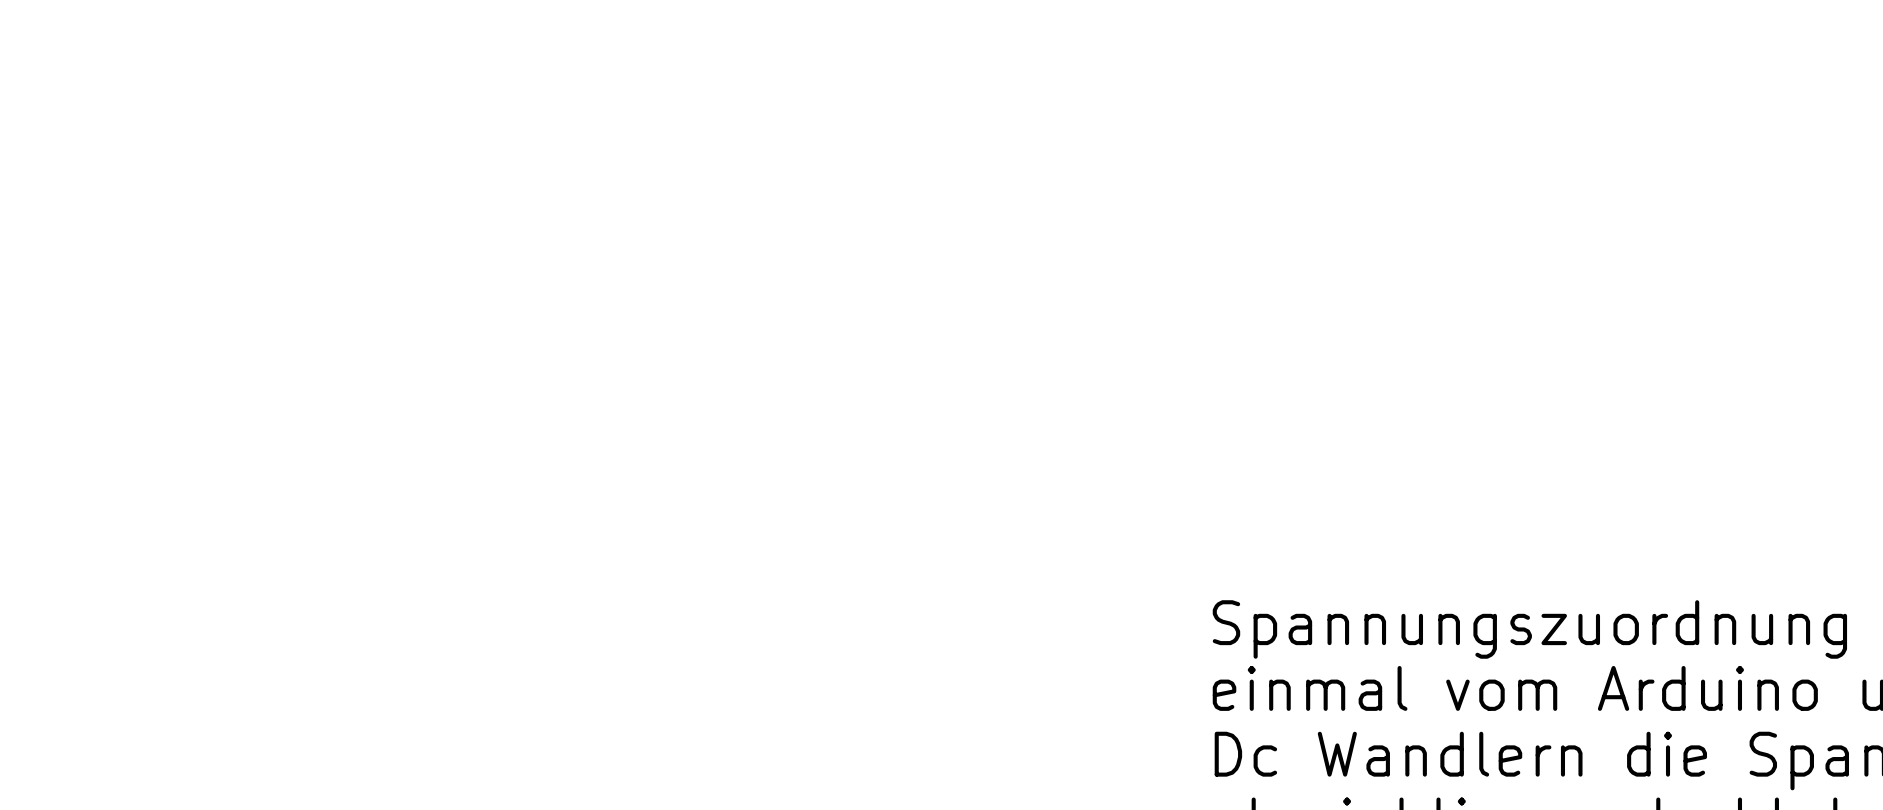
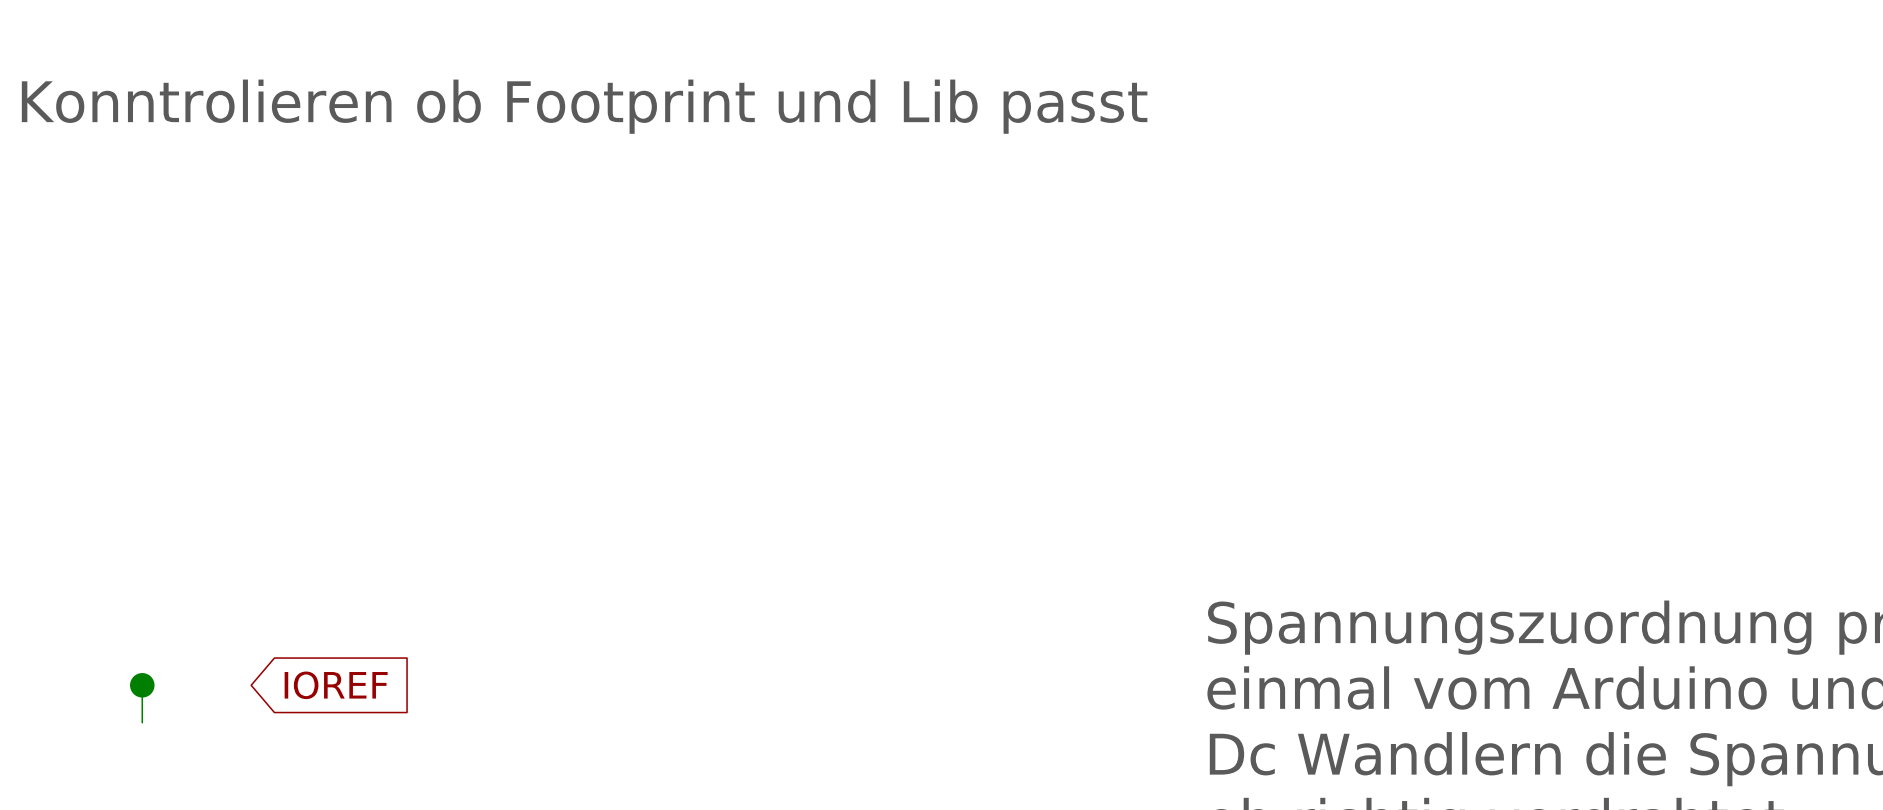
text: none -> Konntrolieren ob Footprint und Lib passt (584, 106)
wire: none -> (142, 685) (142, 722)
junction: none -> (142, 685)
global label: none -> IOREF (336, 685)

